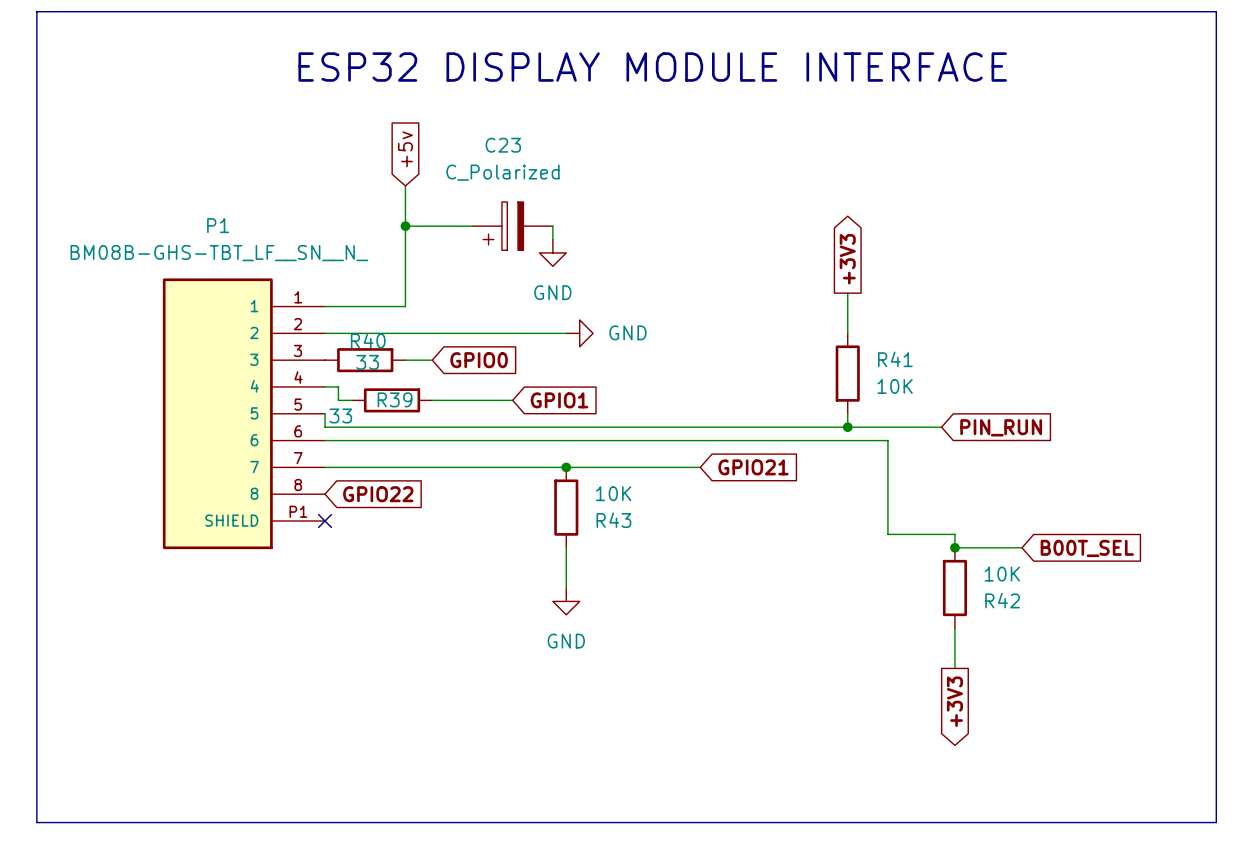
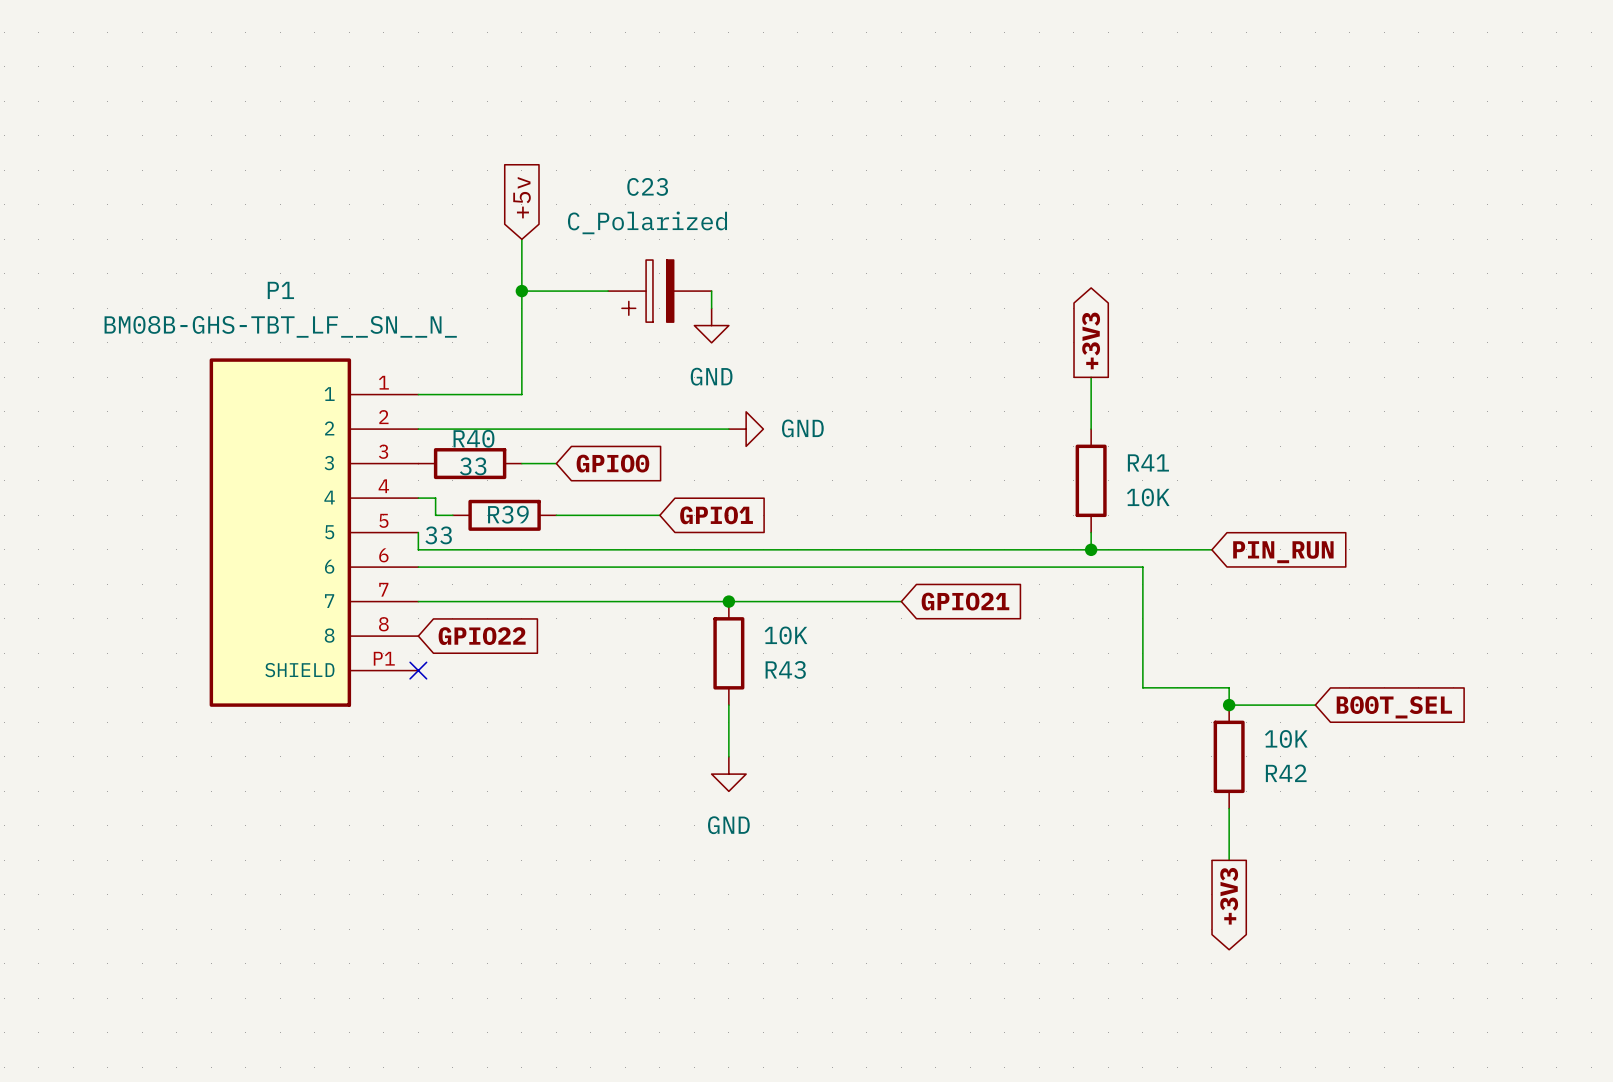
line: (36, 11) (1216, 11) (1216, 822) (36, 822) (36, 11) -> none
text: ESP32 DISPLAY MODULE INTERFACE (652, 67) -> none

